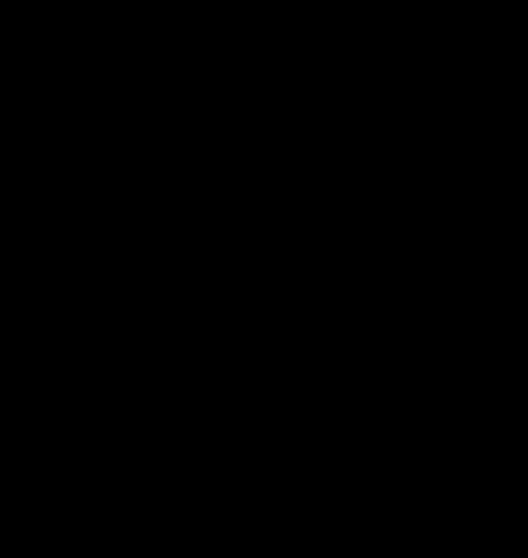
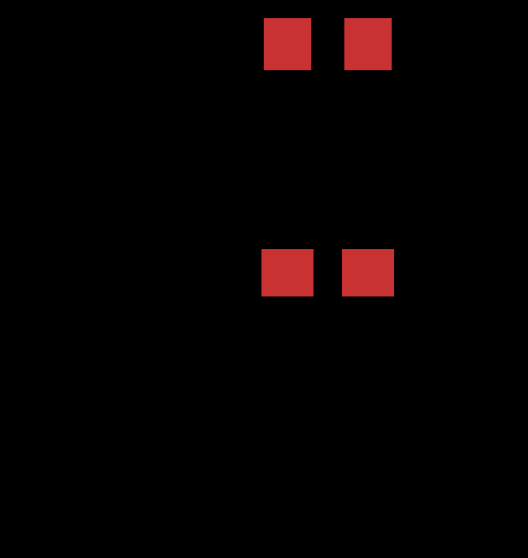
part: none -> (327, 44)
part: none -> (327, 272)

